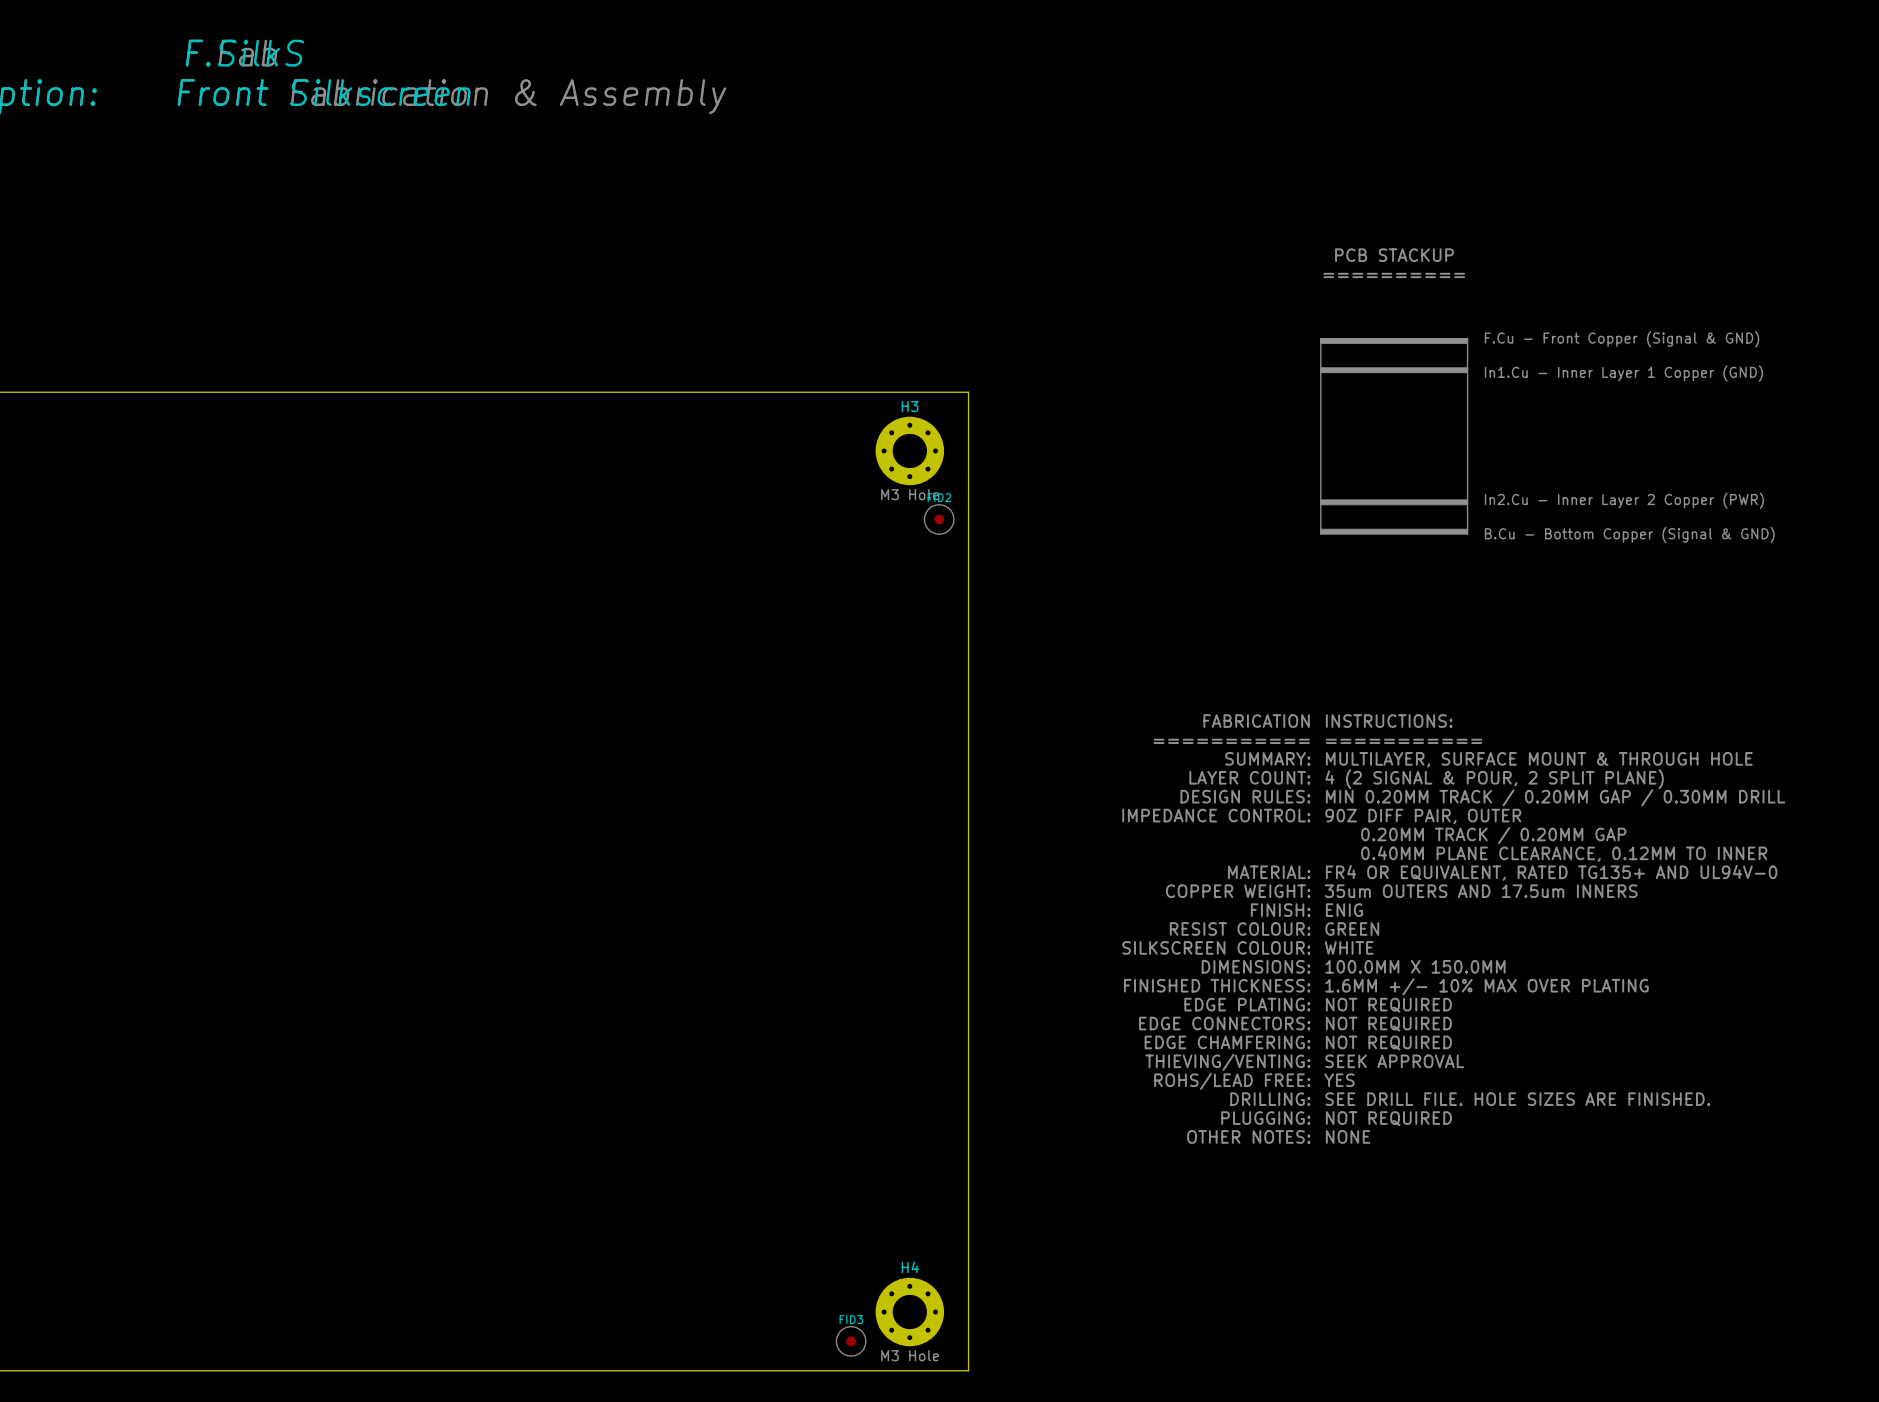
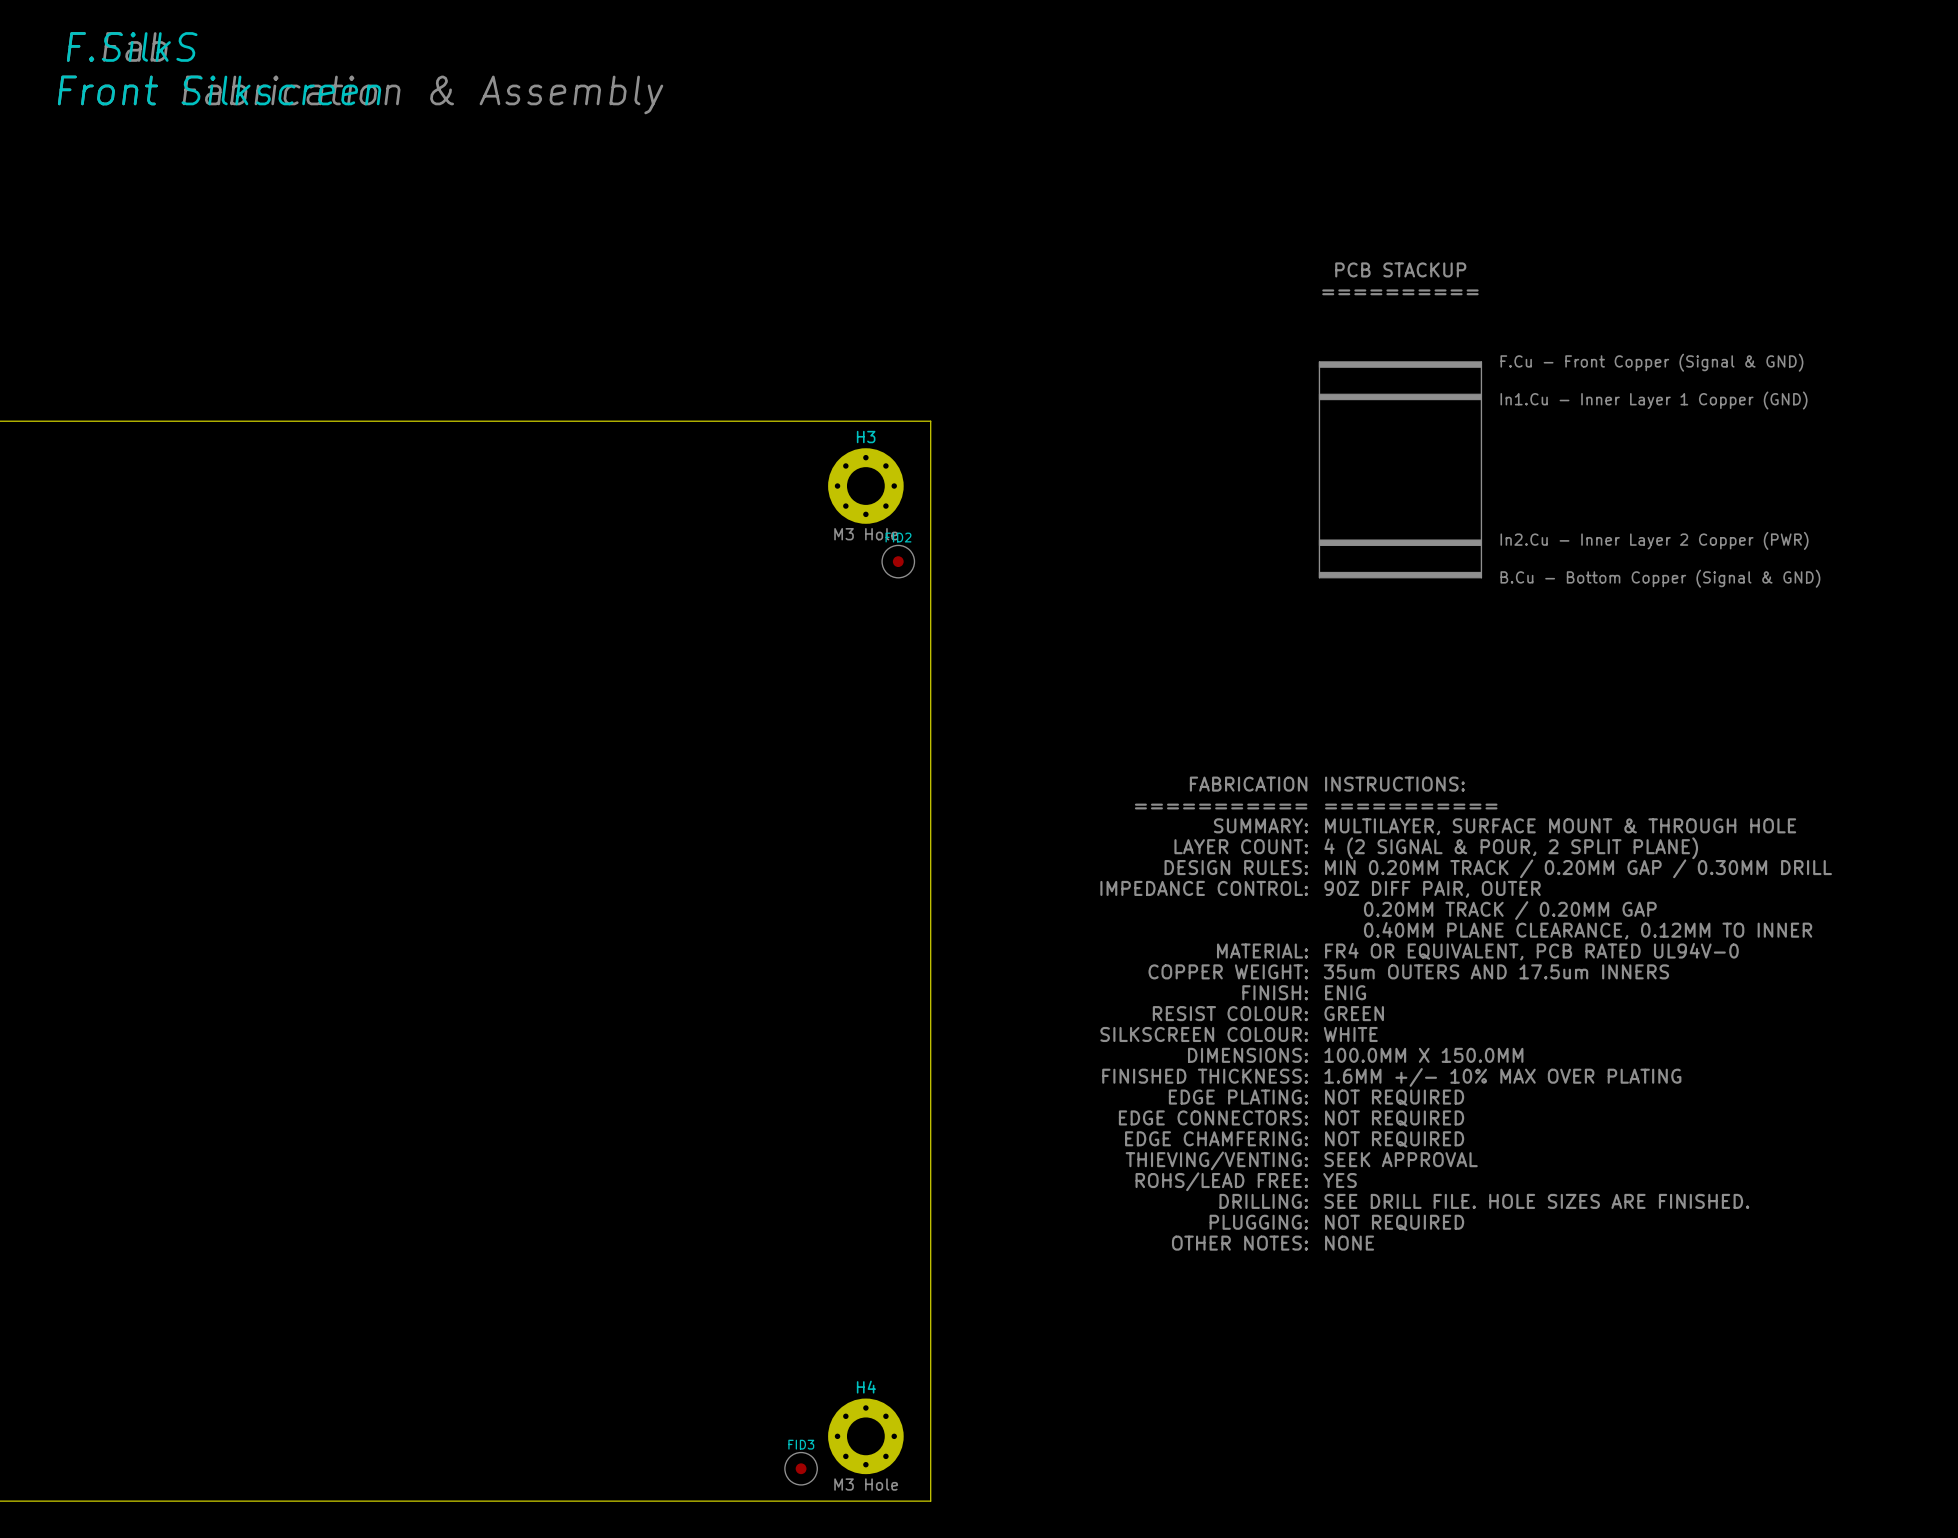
text: FR4 OR EQUIVALENT, RATED TG135+ AND UL94V-0 (1551, 872) -> FR4 OR EQUIVALENT, PCB RATED UL94V-0 (1531, 951)

